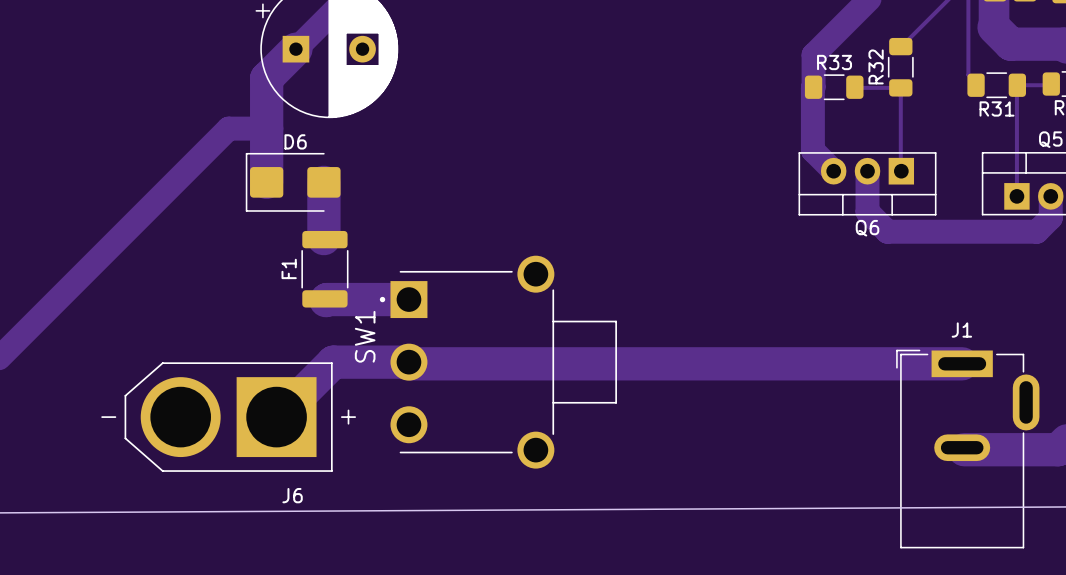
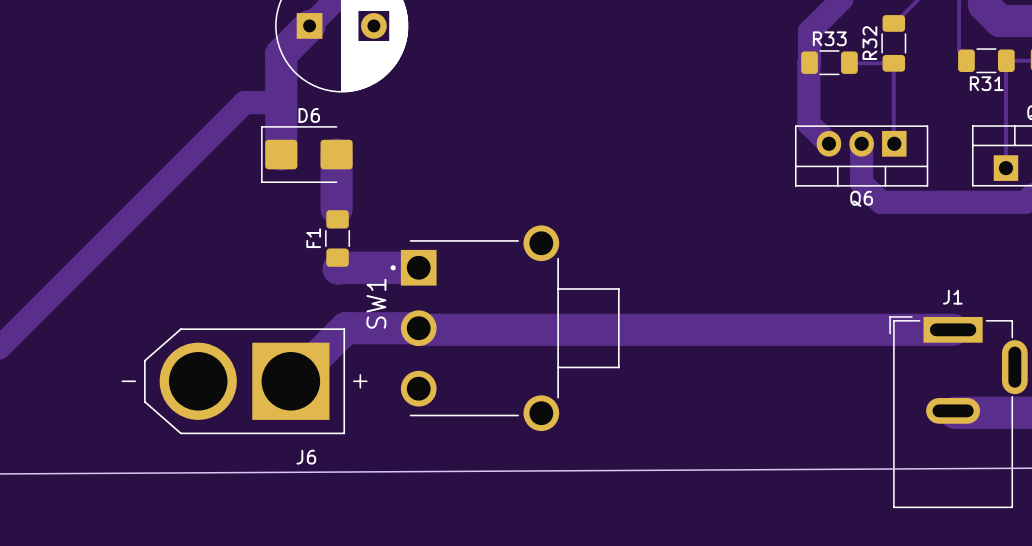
F1 footprint: [301, 230, 349, 308] -> [325, 210, 351, 267]

